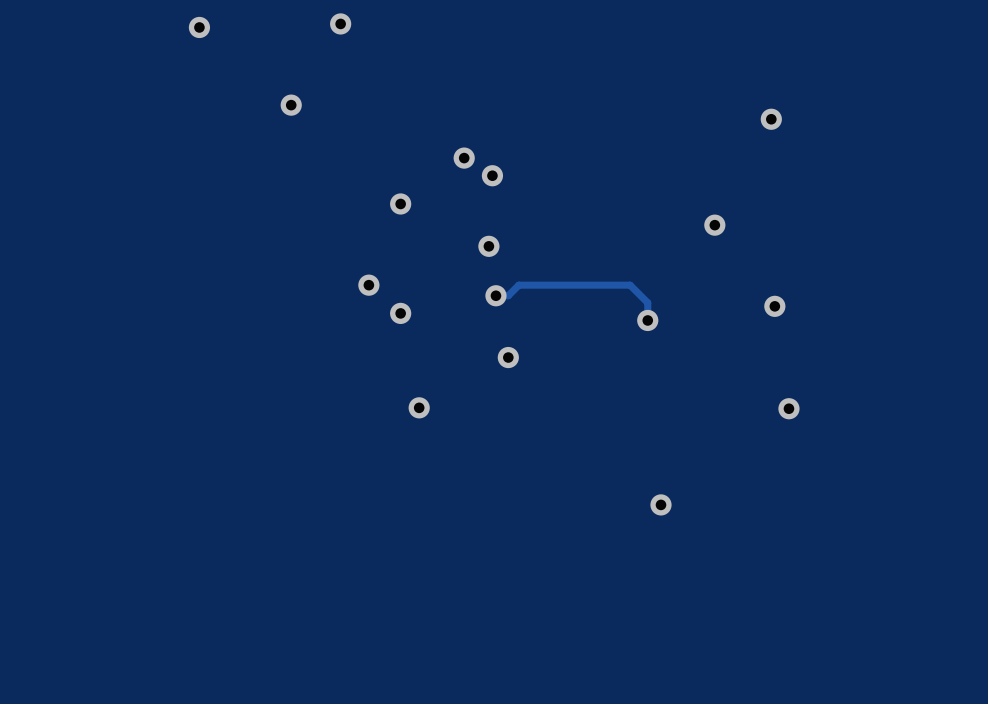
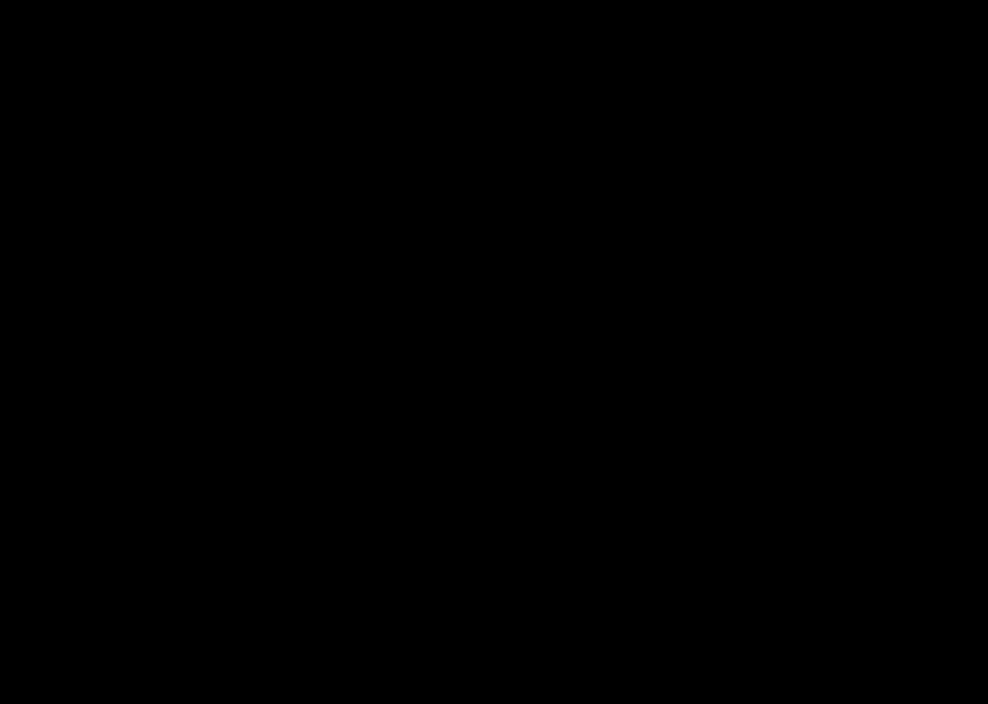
via: (340, 23) -> none
via: (199, 27) -> none
via: (291, 105) -> none
via: (771, 119) -> none
via: (464, 158) -> none
via: (492, 175) -> none
via: (400, 203) -> none
via: (714, 225) -> none
via: (488, 246) -> none
via: (368, 285) -> none
track: (495, 295) (508, 295) (518, 285) (630, 285) (647, 302) (647, 320) -> none
via: (495, 295) -> none
via: (774, 306) -> none
via: (400, 313) -> none
via: (647, 320) -> none
via: (508, 357) -> none
via: (419, 407) -> none
via: (788, 408) -> none
via: (661, 504) -> none

